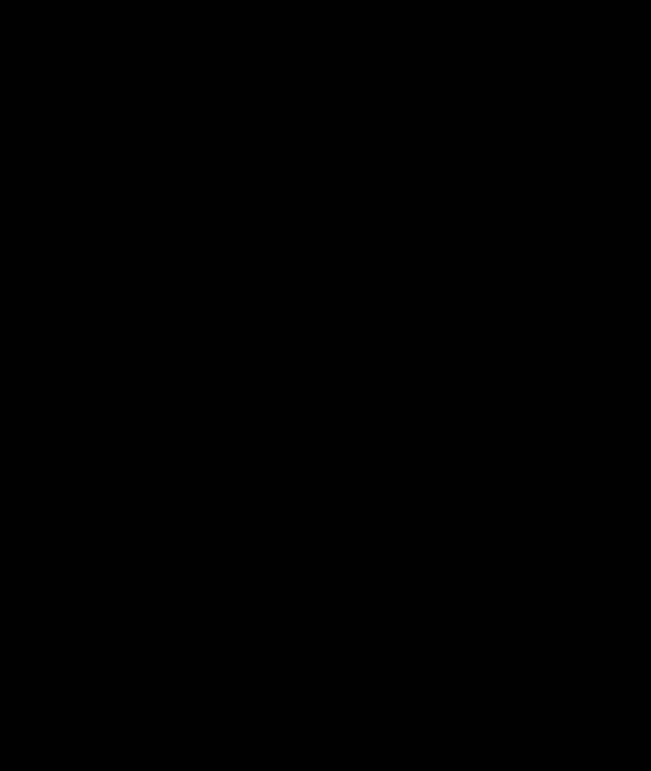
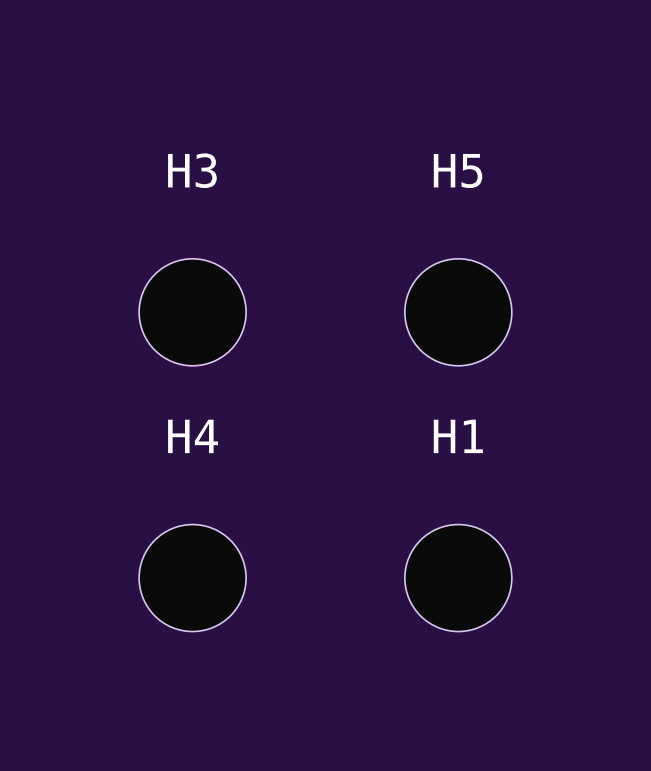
H3: none -> (192, 312)
H5: none -> (458, 312)
H4: none -> (192, 578)
H1: none -> (458, 578)

